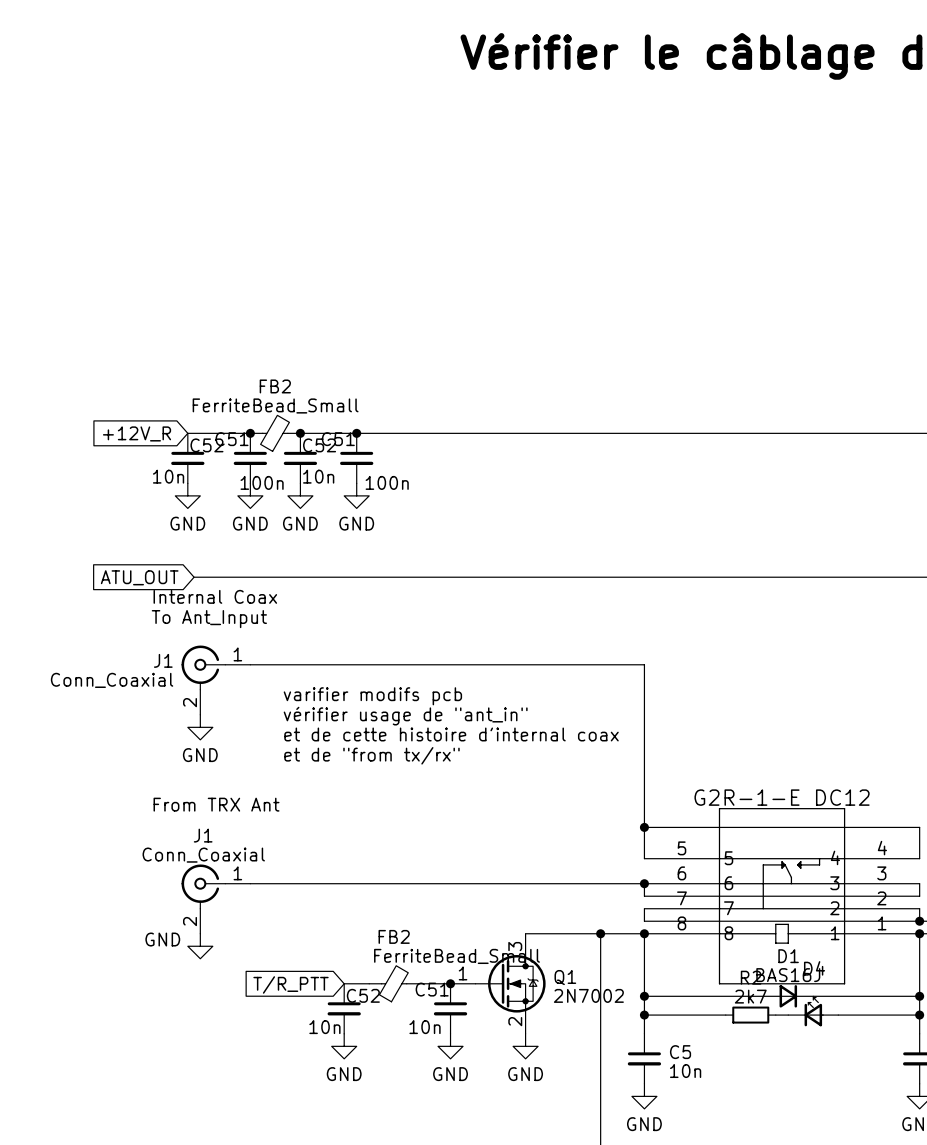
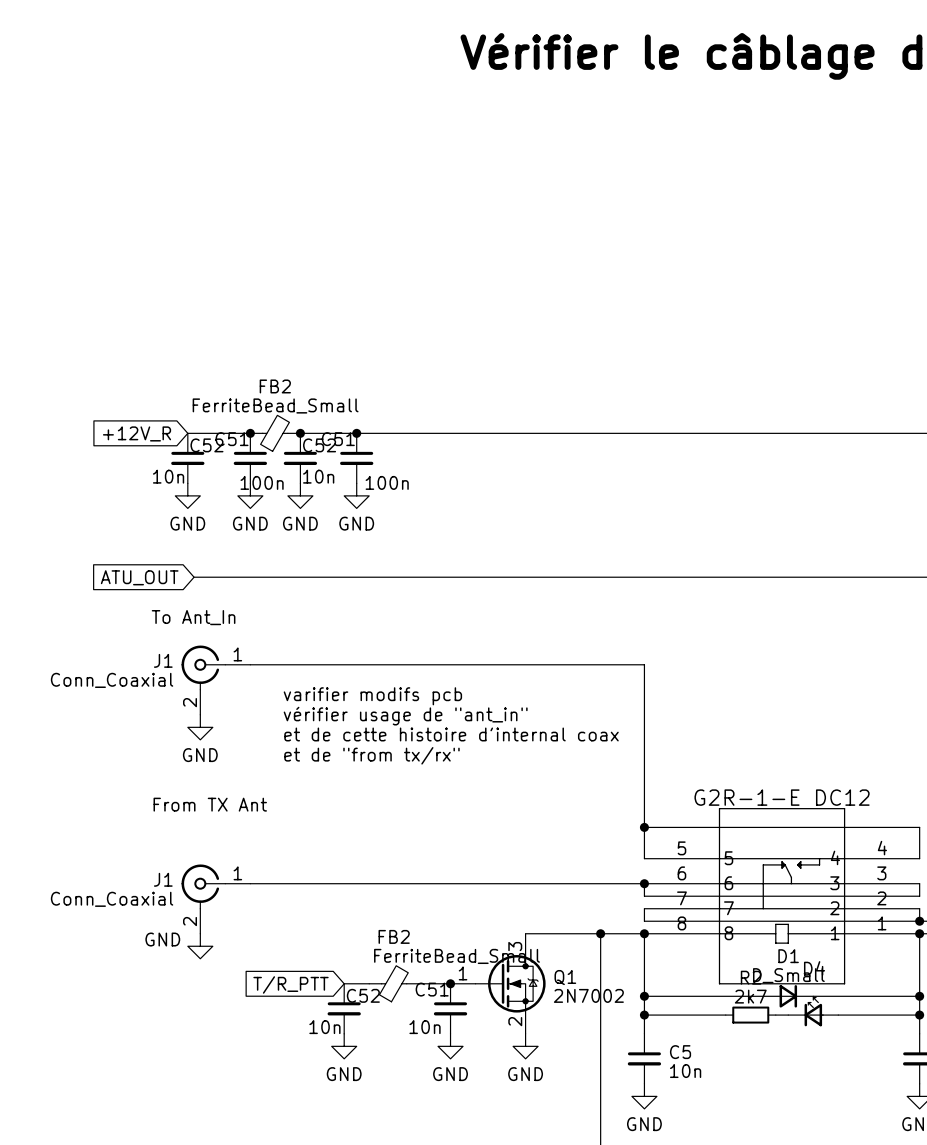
text: Internal Coax (215, 596) -> none
text: To Ant_Input (209, 619) -> To Ant_In (193, 617)
text: From TRX Ant (216, 804) -> From TX Ant (210, 804)
J1 name position: J1 (203, 835) -> J1 (163, 879)
J1 value position: Conn_Coaxial (203, 855) -> Conn_Coaxial (112, 899)
D1 value: BAS16J (788, 975) -> D_Small (788, 975)

